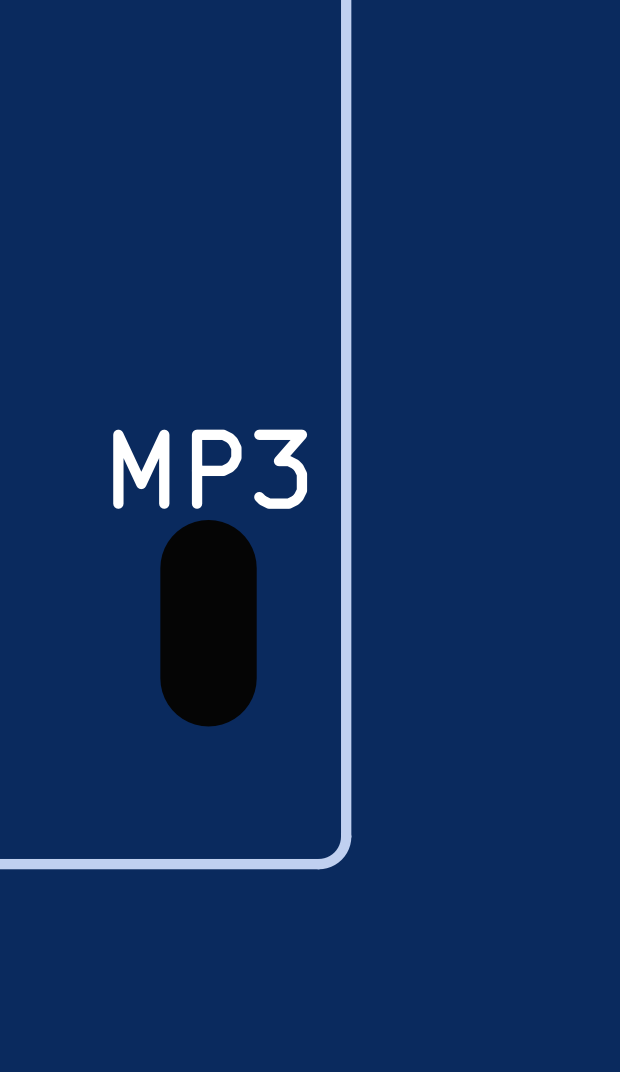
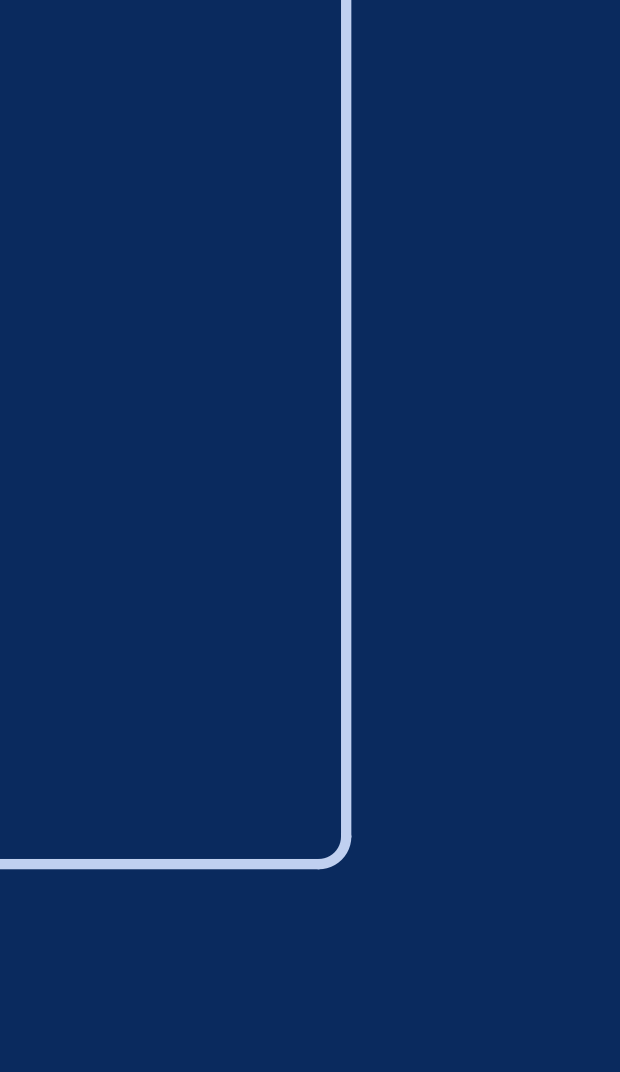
MP3: (208, 623) -> none

